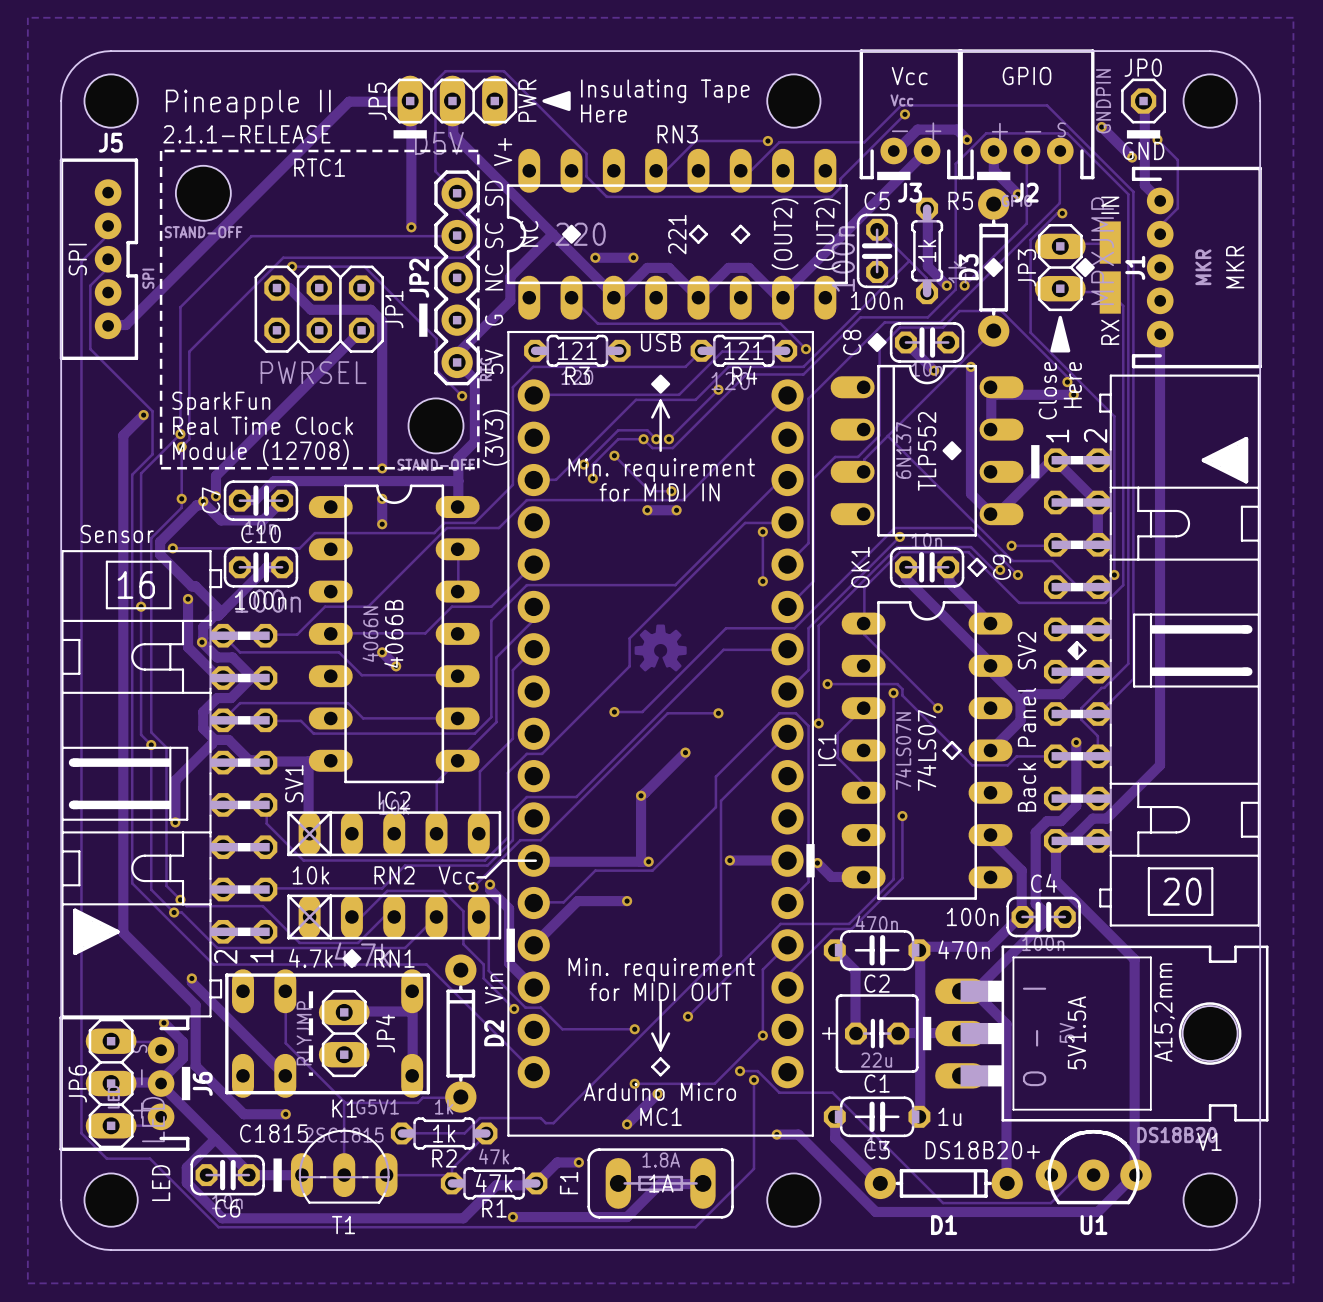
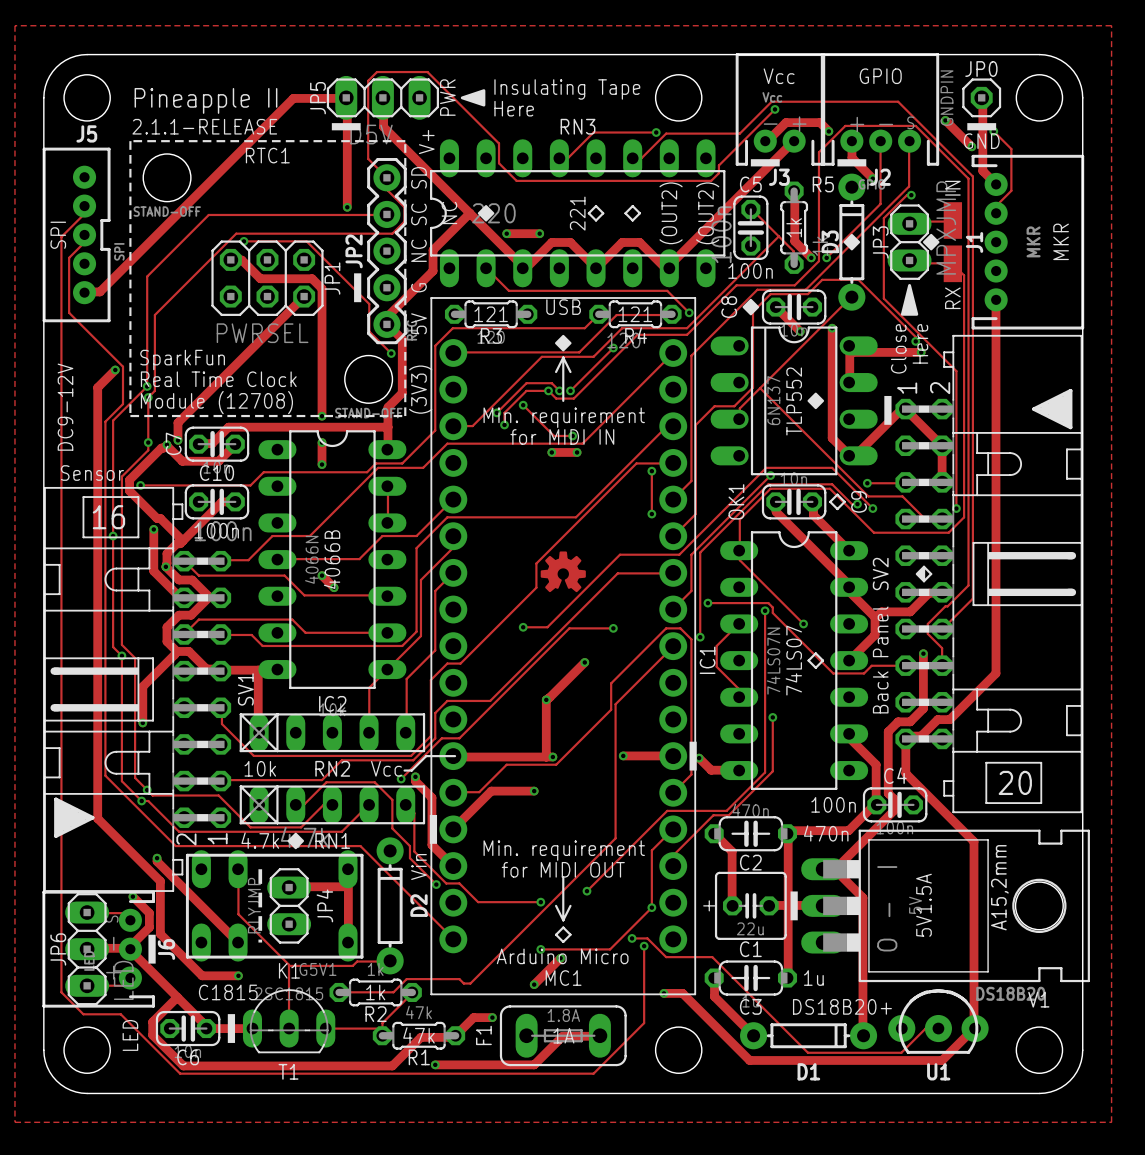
text: none -> DC9-12V (65, 407)

